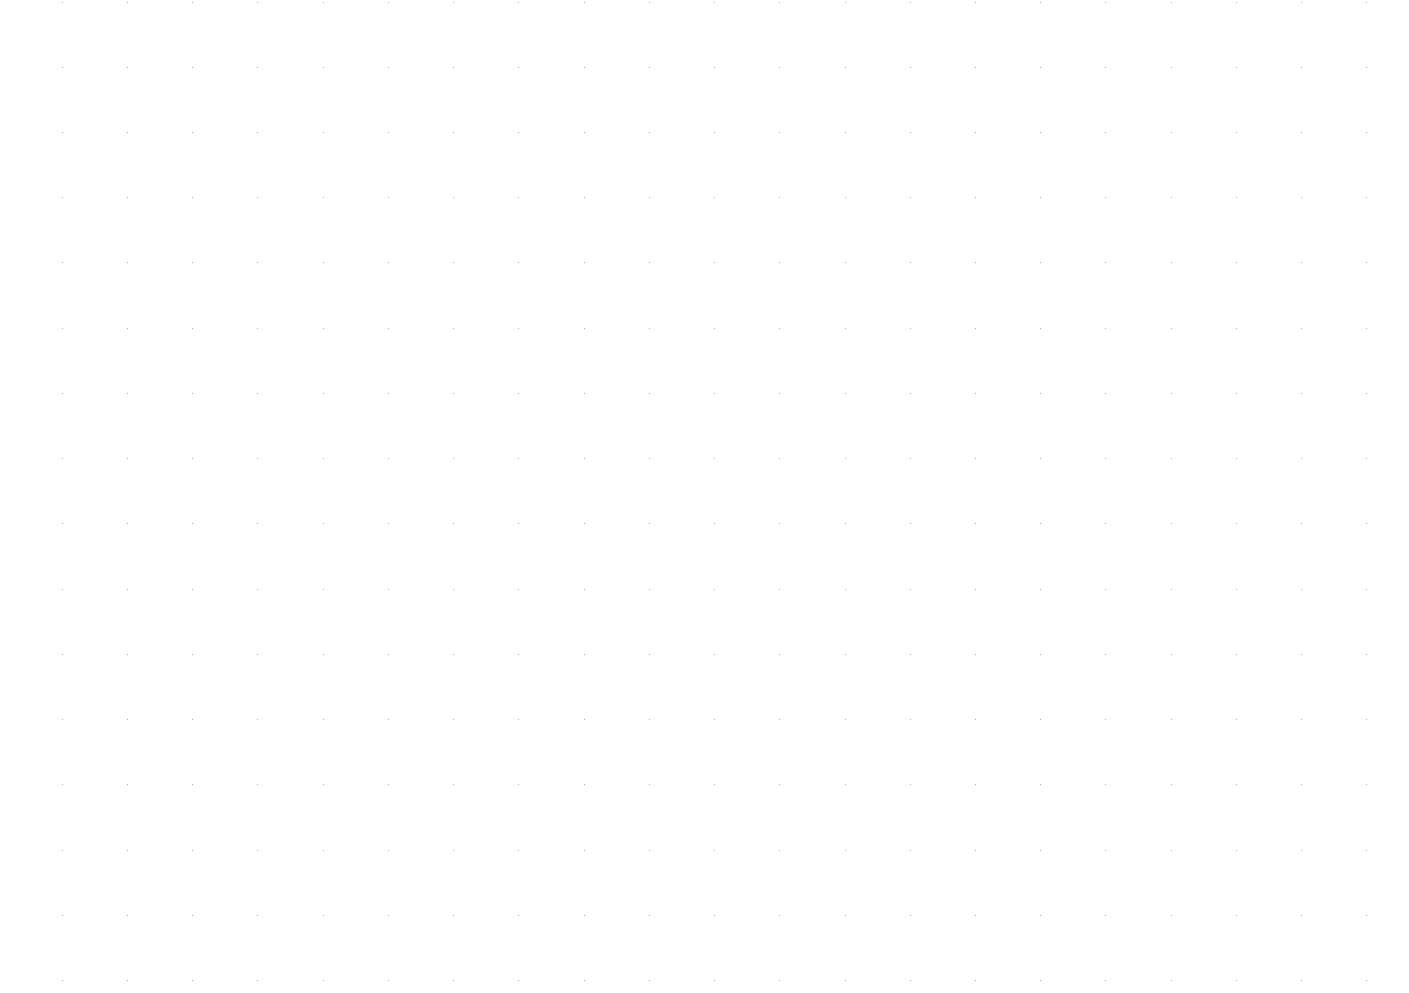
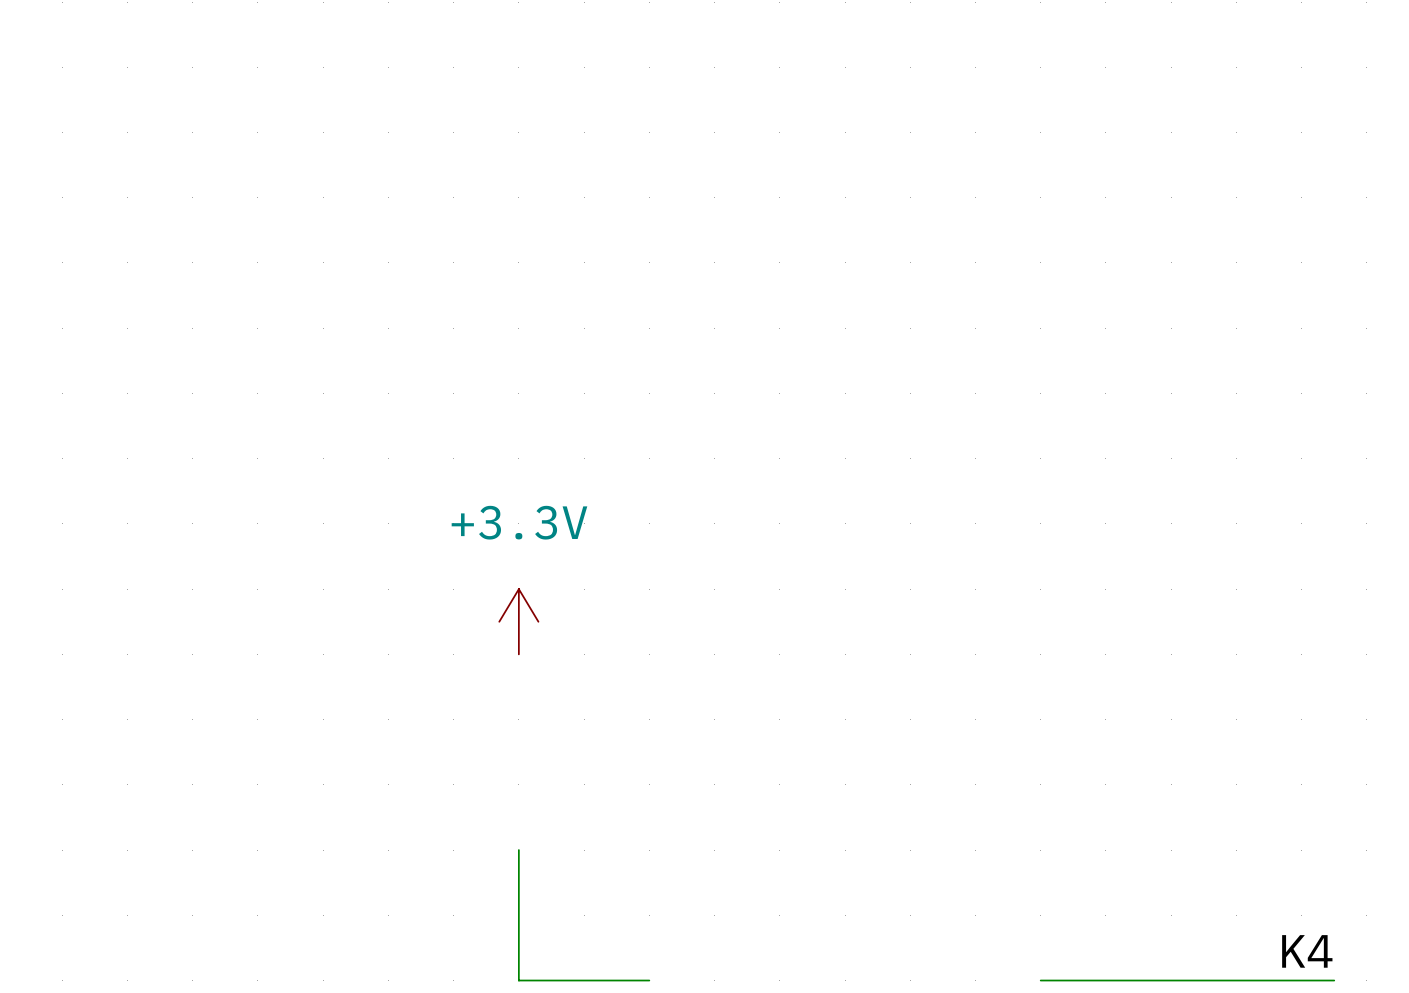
power symbol: none -> +3.3V (518, 621)
wire: none -> (518, 850) (518, 980) (649, 980)
label: none -> K4 (1307, 951)
wire: none -> (1040, 980) (1334, 980)

